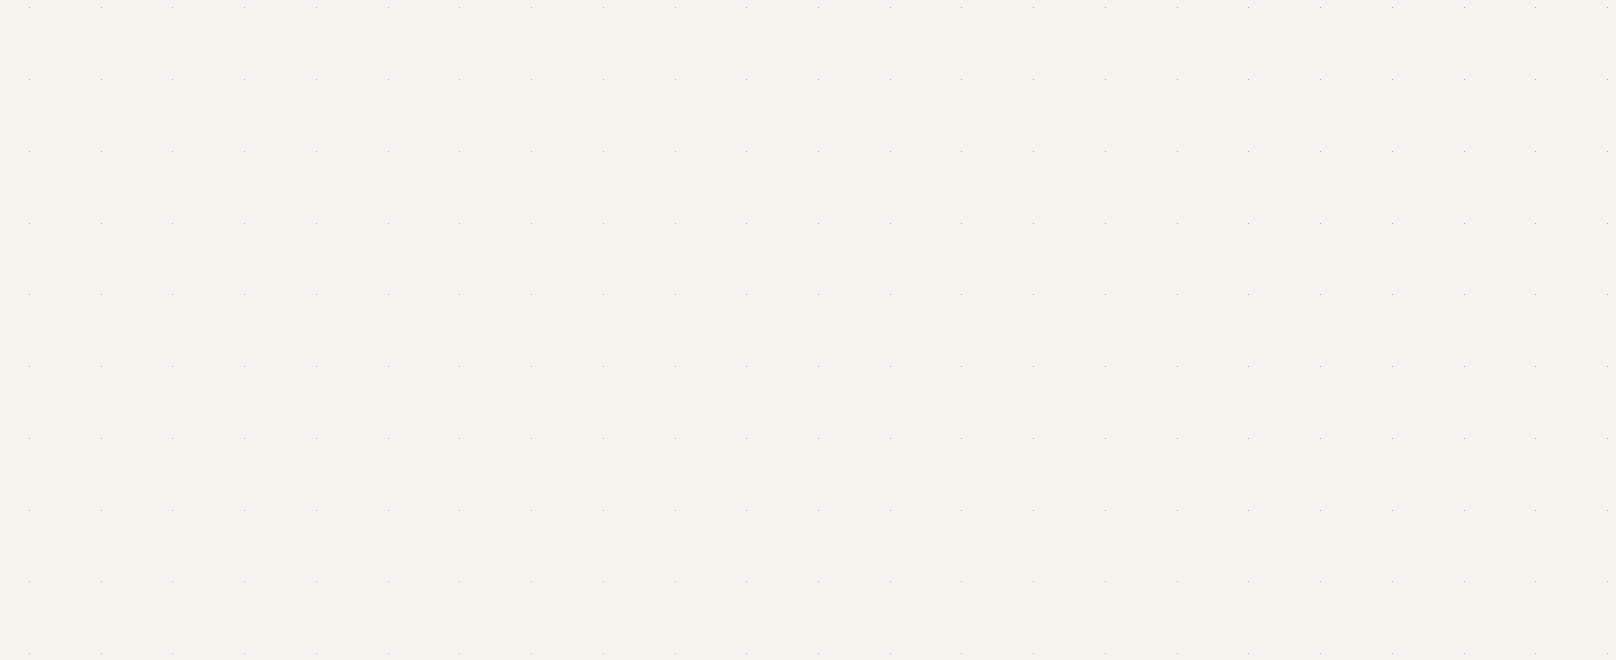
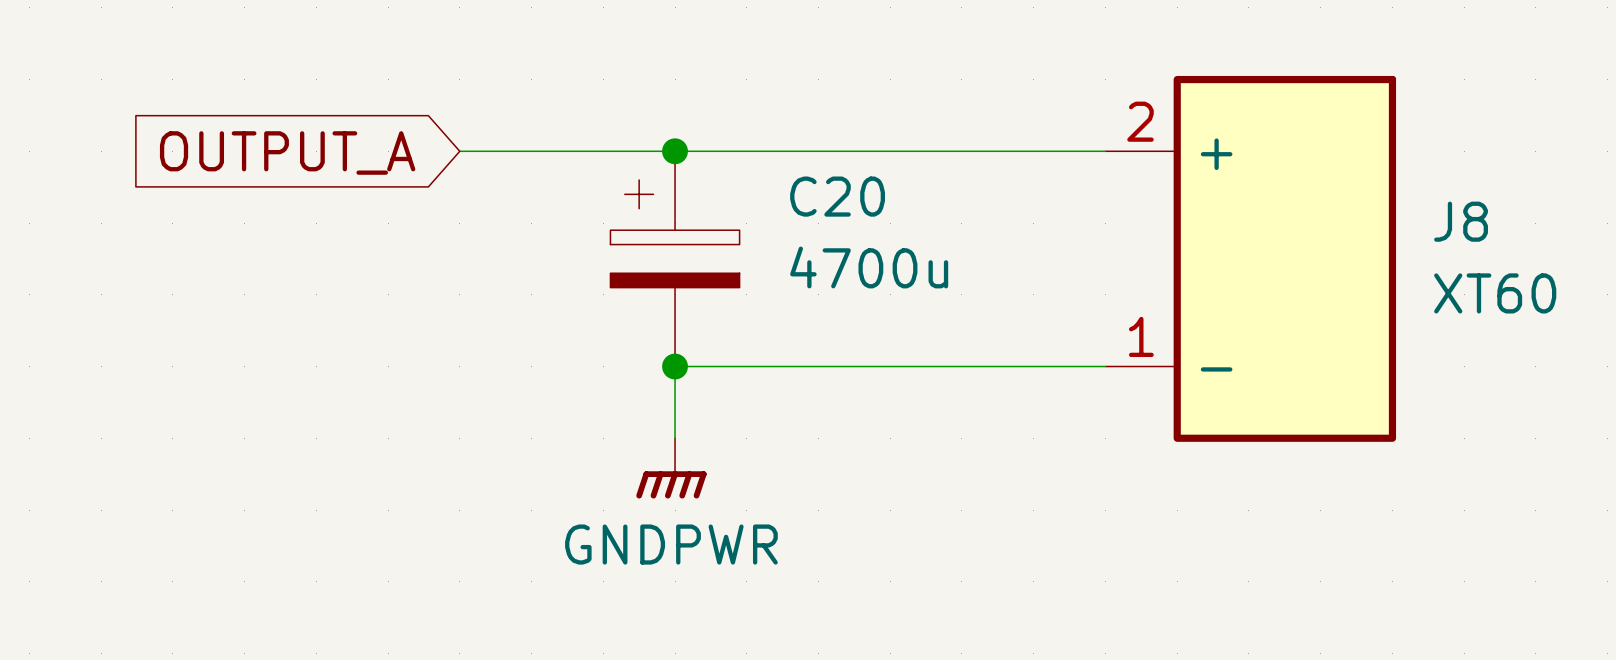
wire: none -> (459, 151) (1105, 151)
junction: none -> (675, 151)
global label: none -> OUTPUT_A (287, 153)
C20: none -> 4700u (675, 258)
J8: none -> XT60 (1250, 258)
junction: none -> (675, 366)
wire: none -> (1105, 366) (675, 366) (675, 438)
power symbol: none -> GNDPWR (671, 468)

